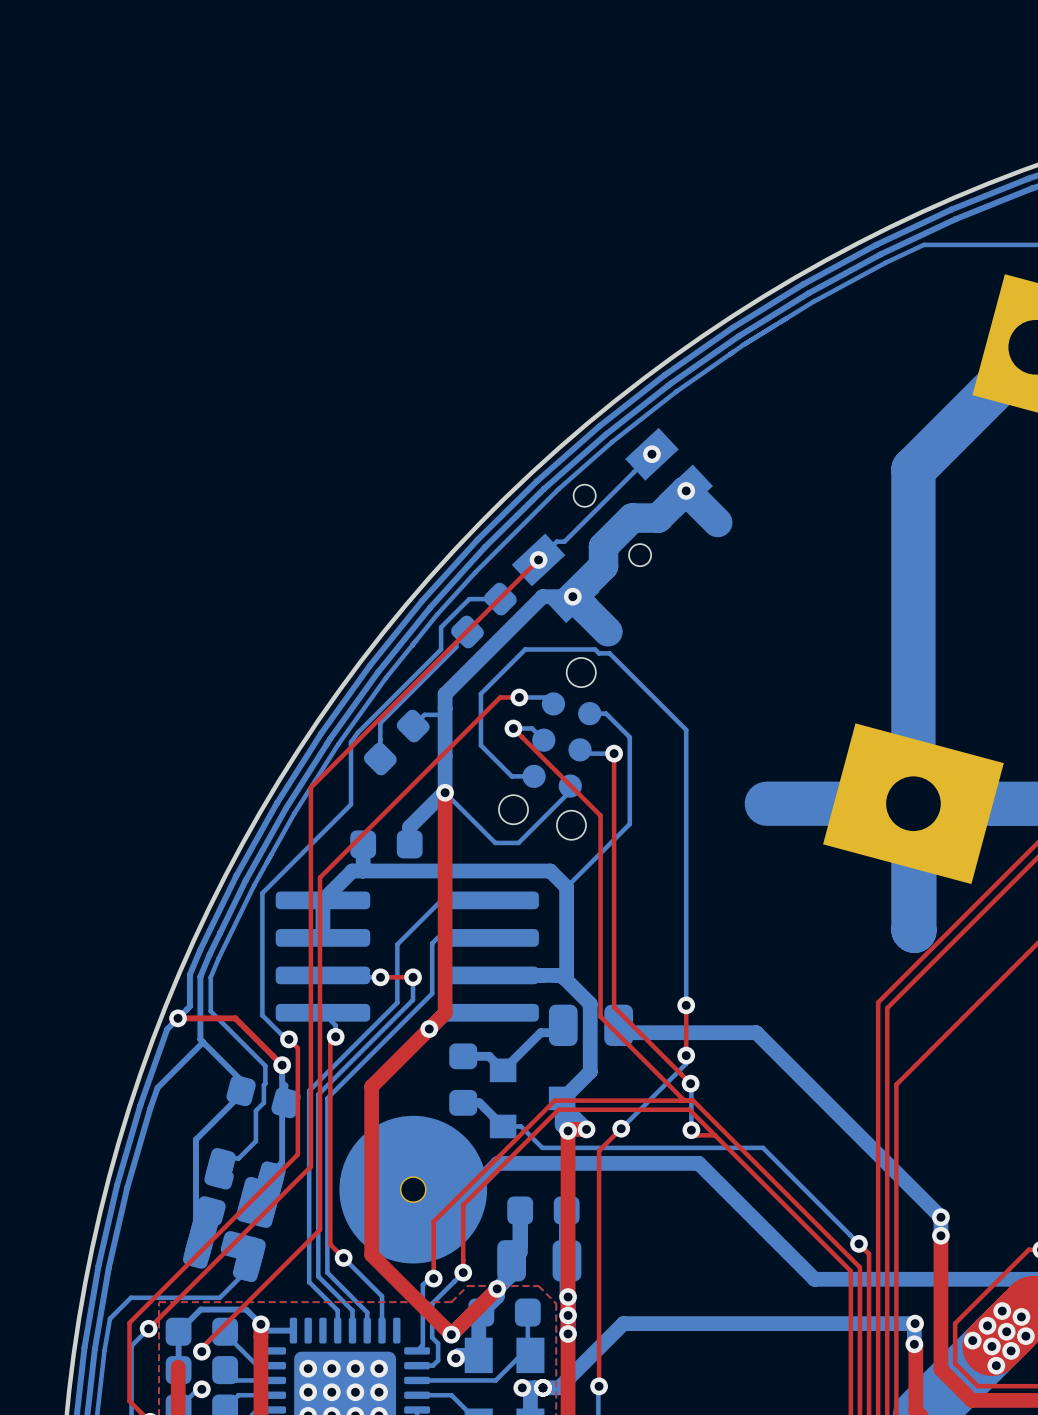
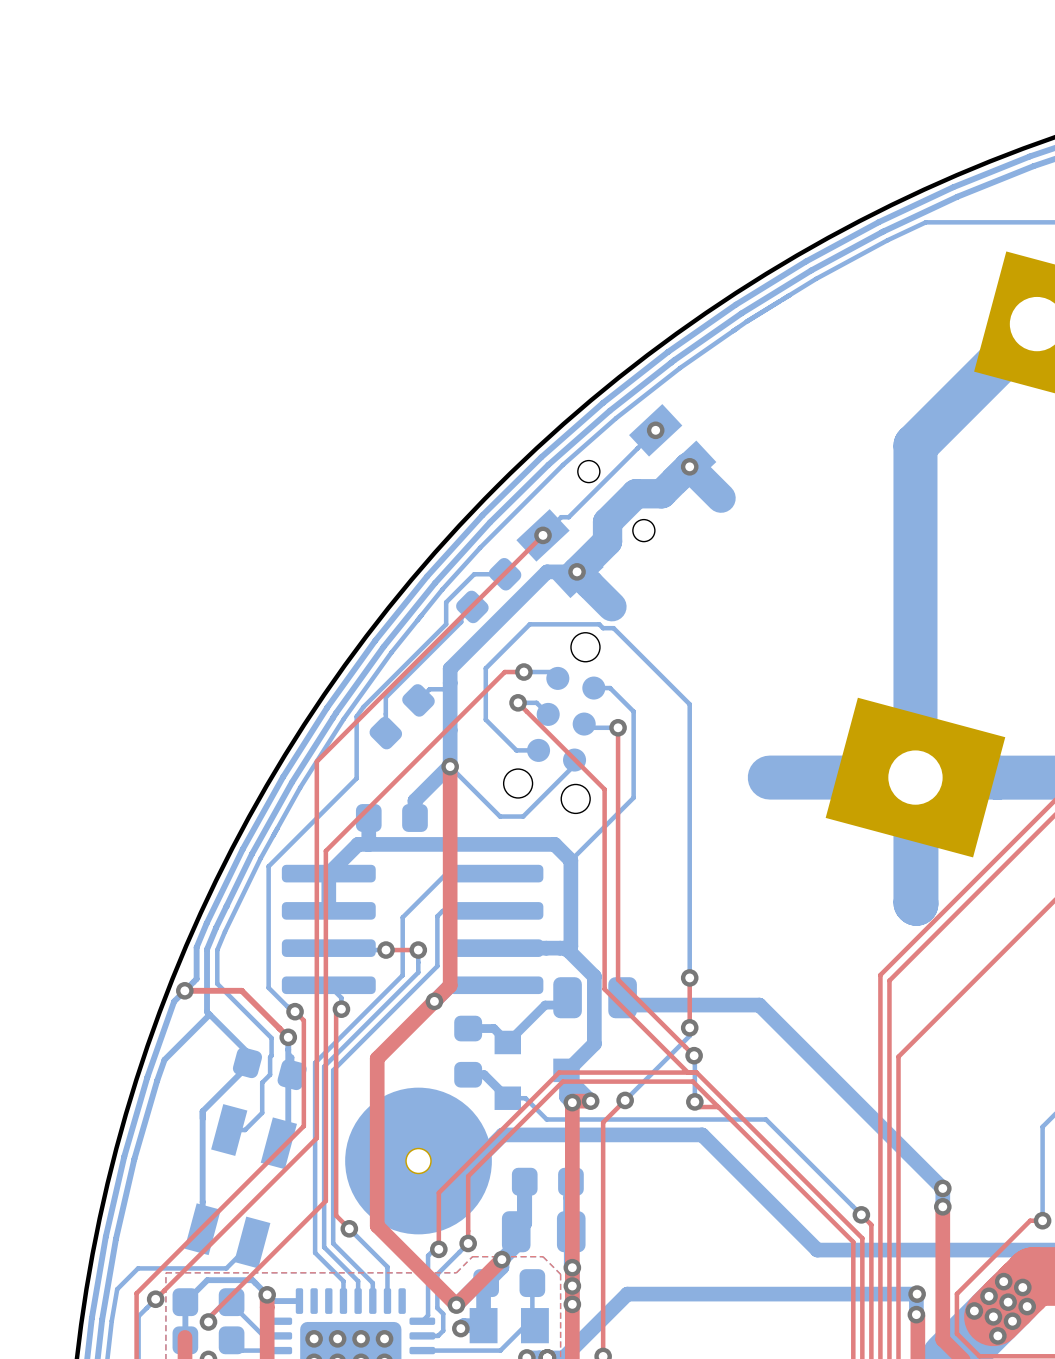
part footprint: [182, 1147, 286, 1283] -> [184, 1104, 297, 1269]

